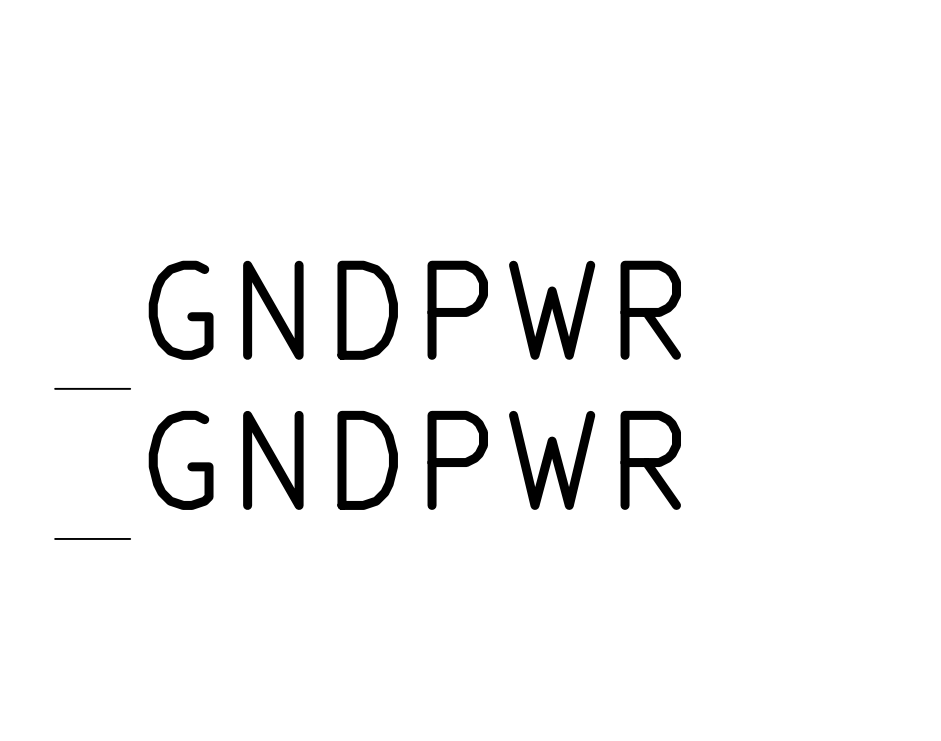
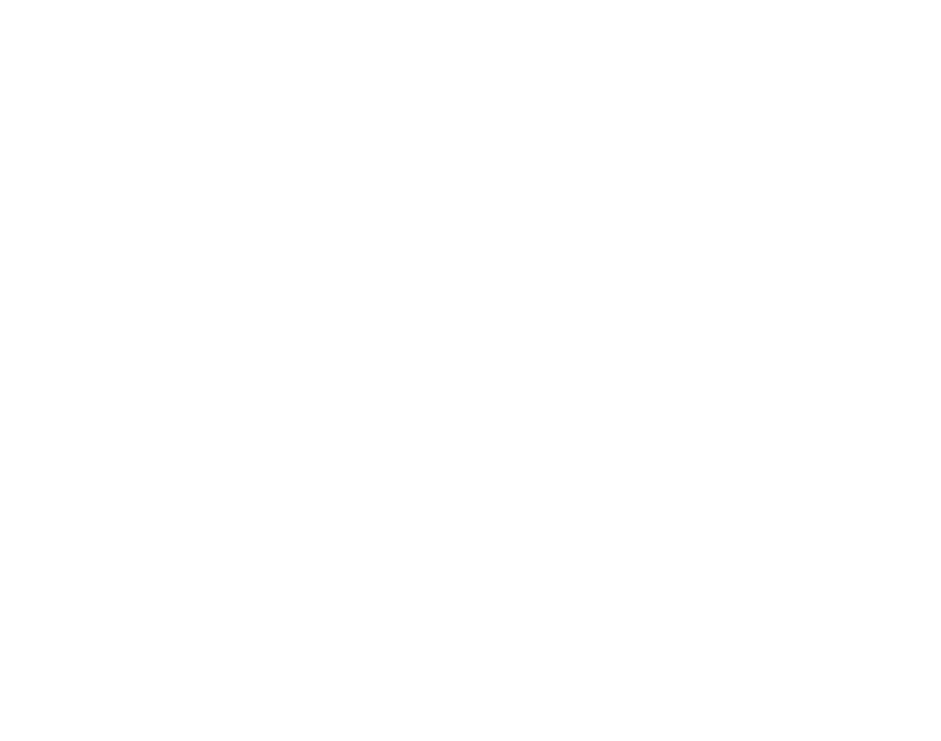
label: GNDPWR (414, 310) -> none
wire: (55, 388) (130, 388) -> none
label: GNDPWR (414, 460) -> none
wire: (55, 538) (130, 538) -> none

